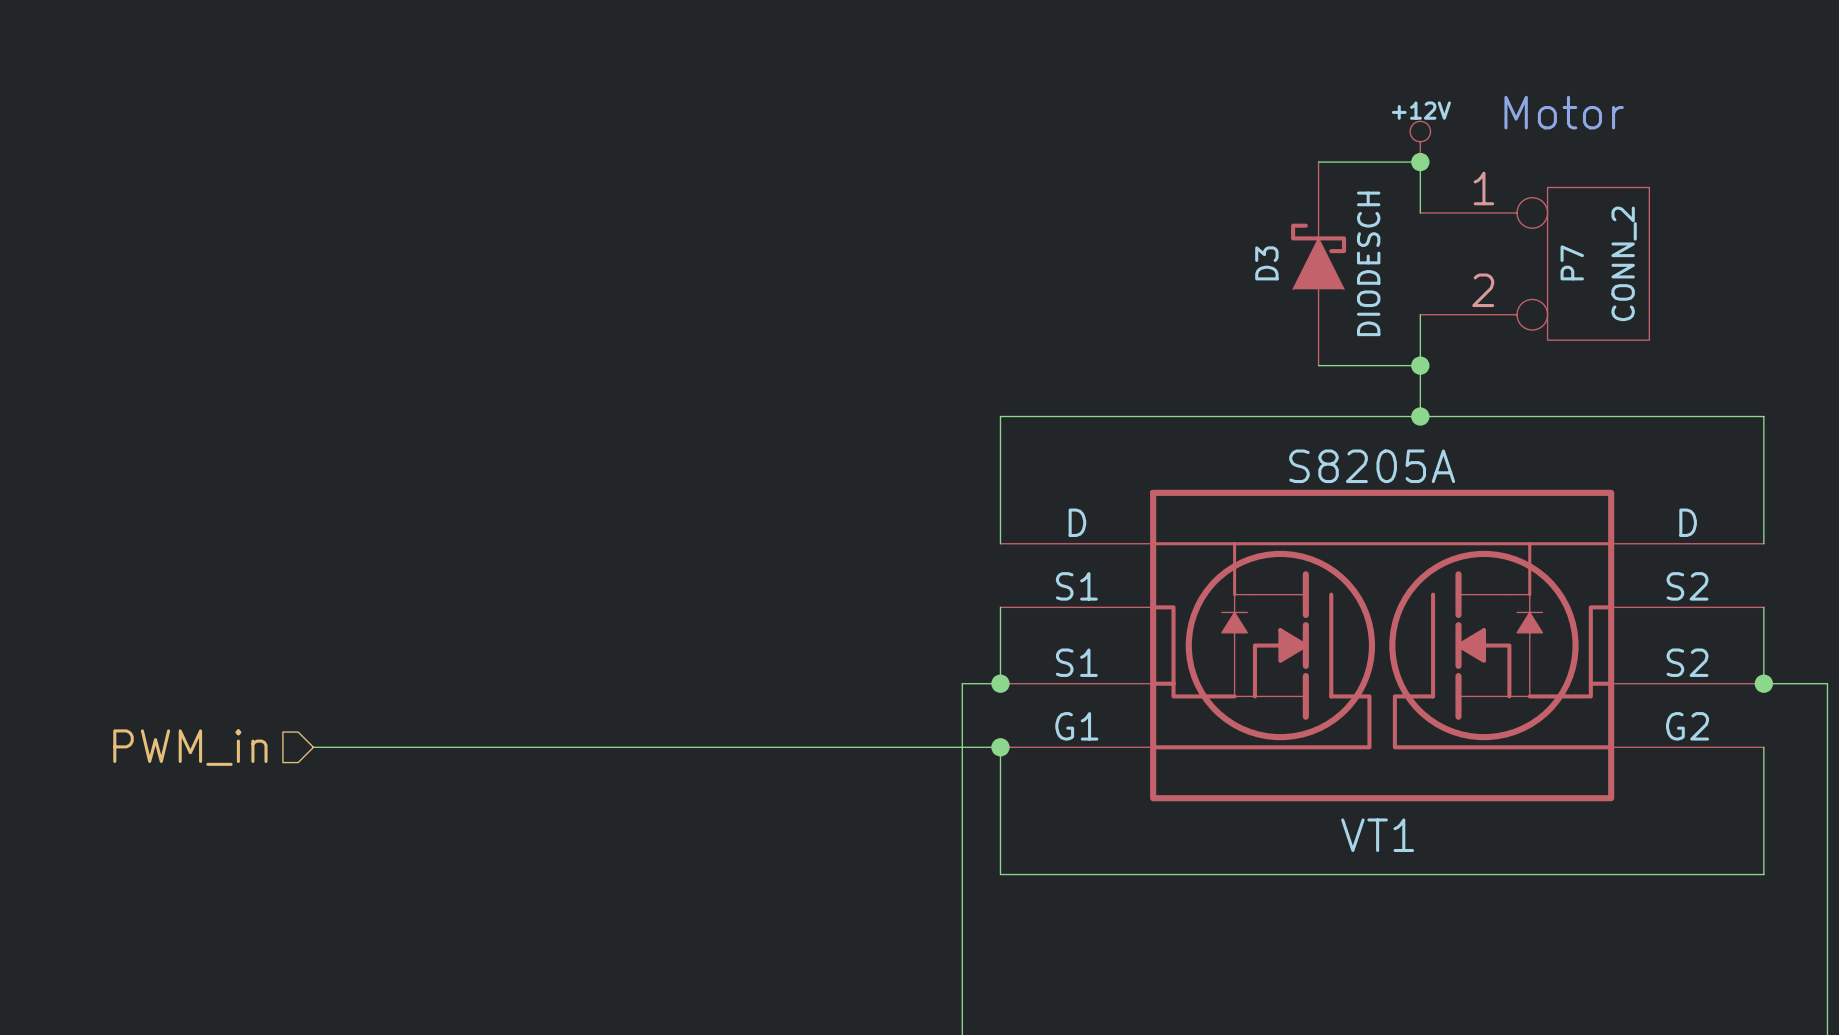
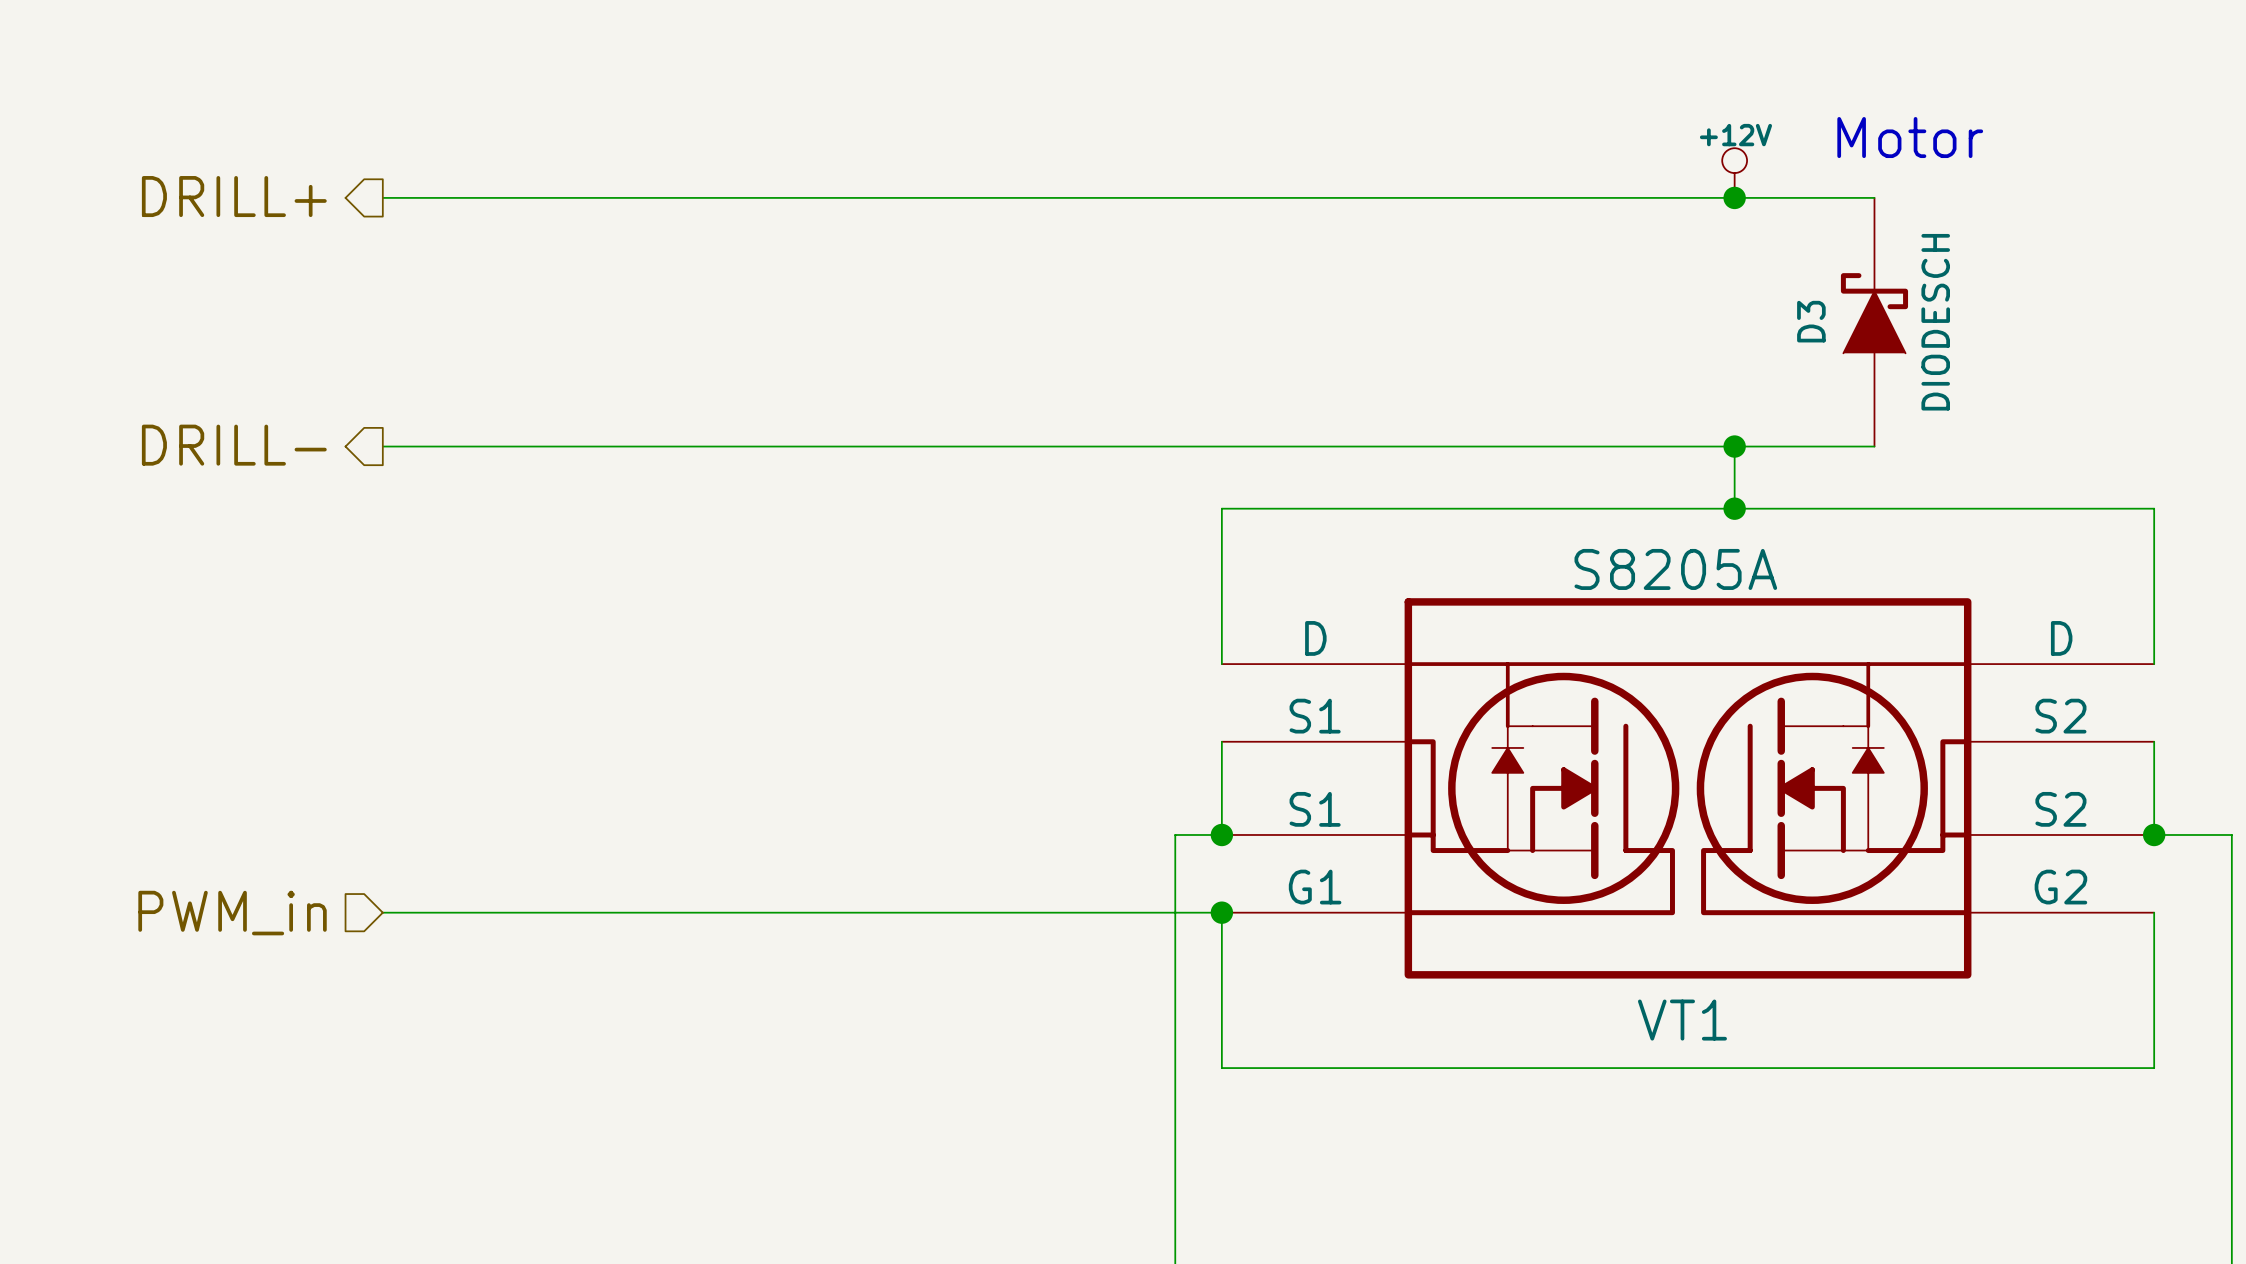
hierarchical label: none -> DRILL+ (234, 196)
wire: none -> (382, 197) (1610, 197)
wire: (1420, 162) (1420, 212) -> (1734, 197) (1874, 197)
D3 position: (1318, 263) -> (1874, 322)
P7: CONN_2 (1534, 263) -> none
wire: (1420, 314) (1420, 365) -> (1874, 446) (1734, 446)
hierarchical label: none -> DRILL- (234, 445)
wire: none -> (382, 446) (1610, 446)

